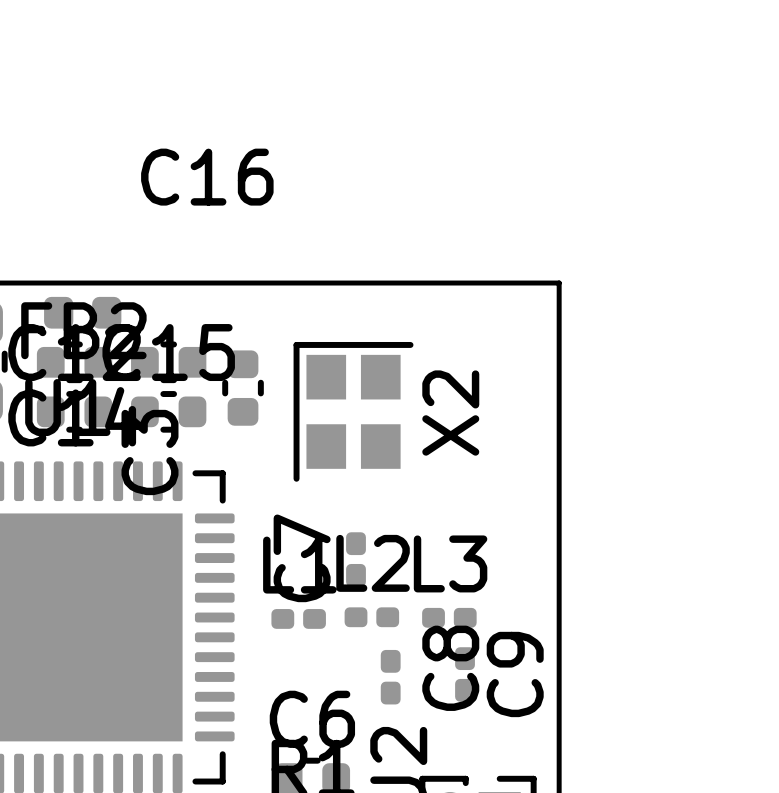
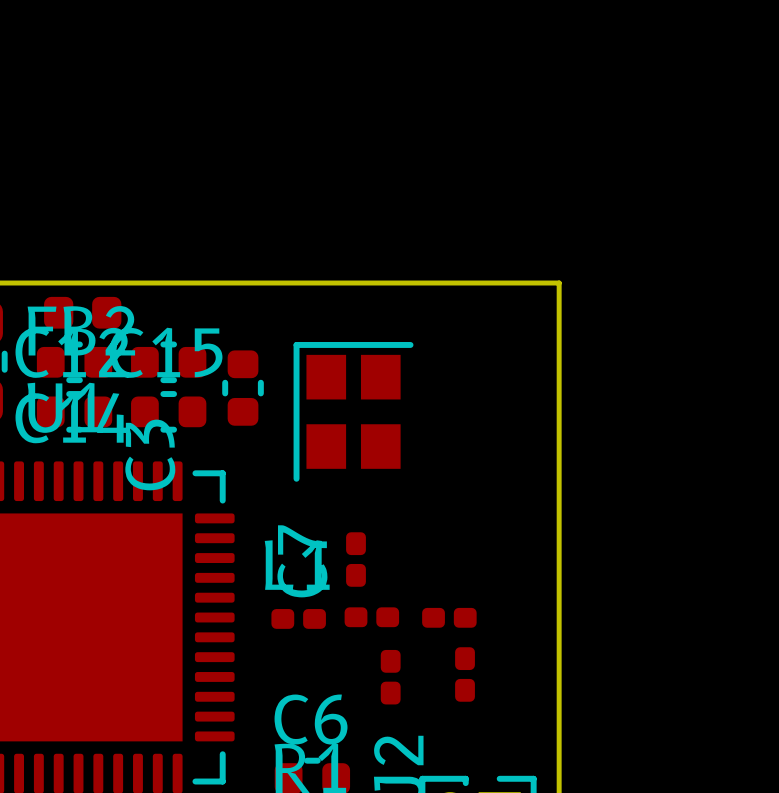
C16 name: C16 (207, 177) -> none
X2 name: X2 (450, 413) -> none
L2 name: L2 (373, 563) -> none
L3 name: L3 (450, 563) -> none
C8 name: C8 (450, 668) -> none
C9 name: C9 (515, 674) -> none

